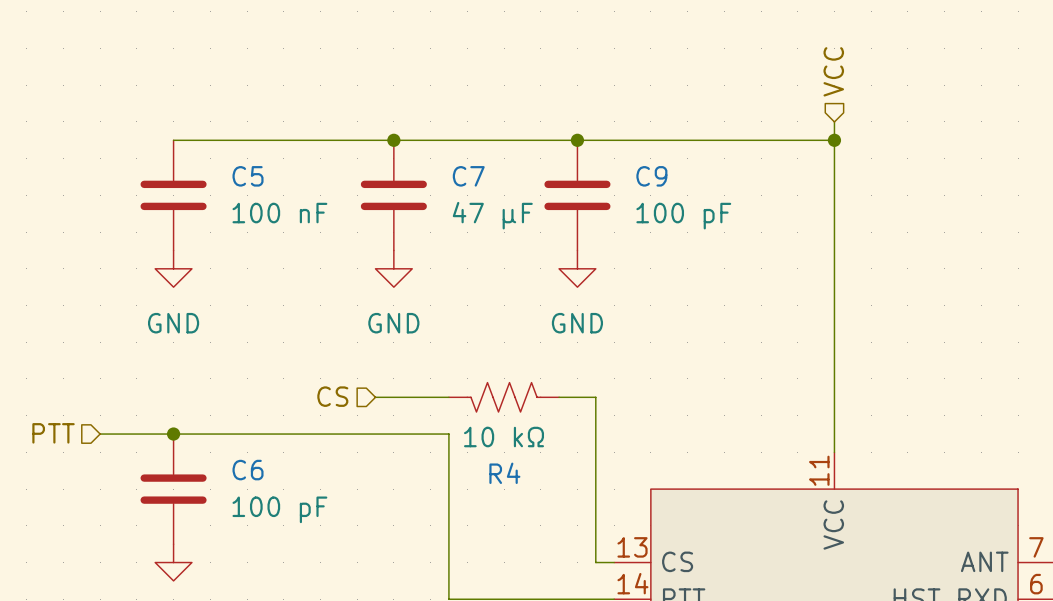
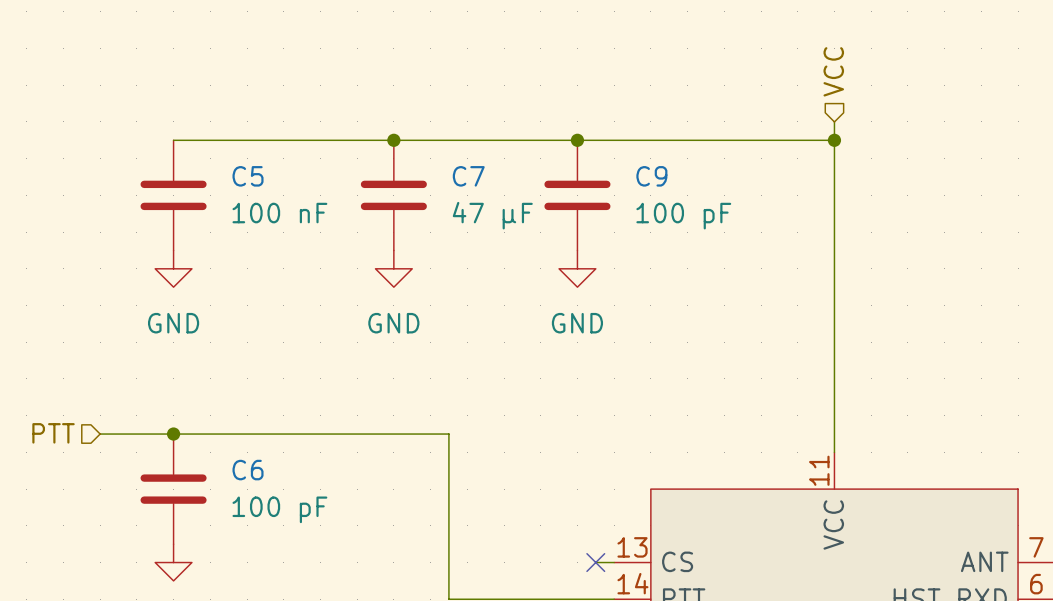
hierarchical label: CS (332, 396) -> none
wire: (375, 397) (448, 397) -> none
R4: 10 kΩ (504, 397) -> none
wire: (559, 397) (595, 397) (595, 562) -> none
no-connect mark: none -> (595, 562)

